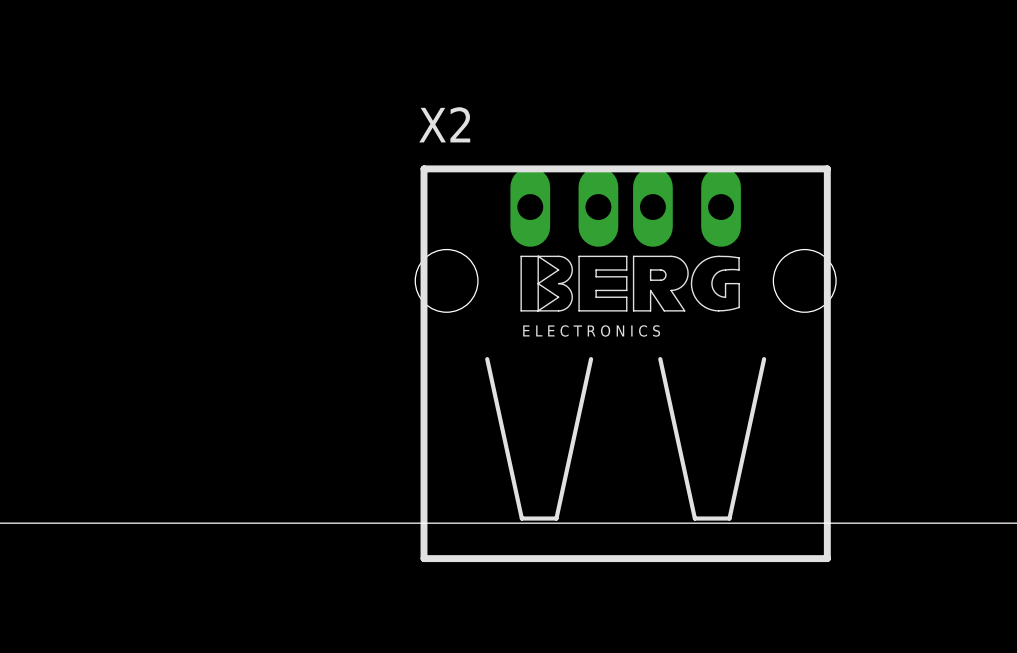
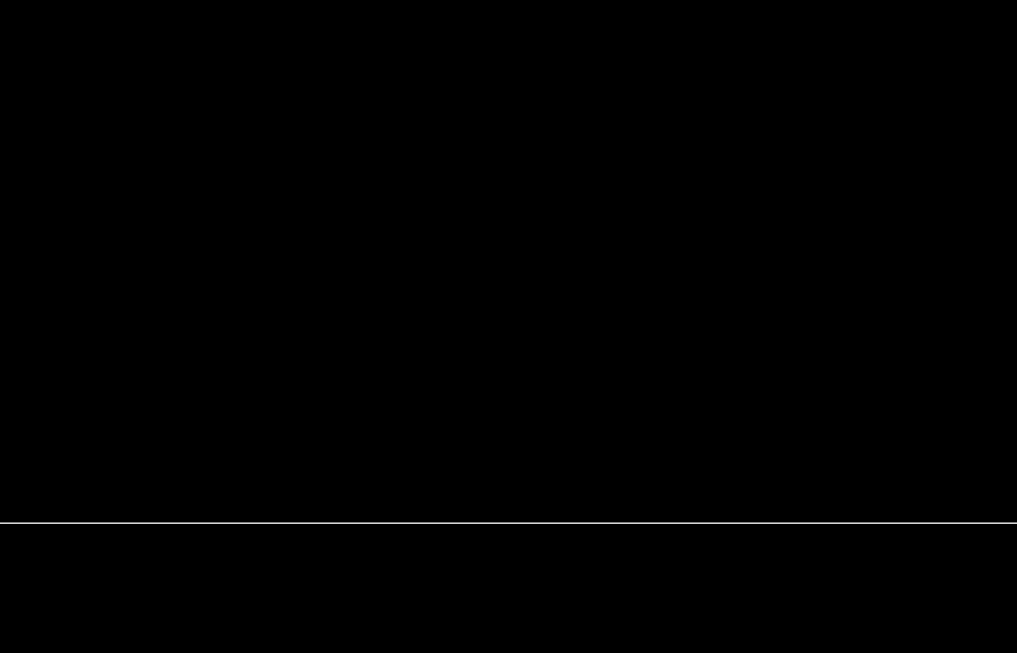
X2: (625, 363) -> none

